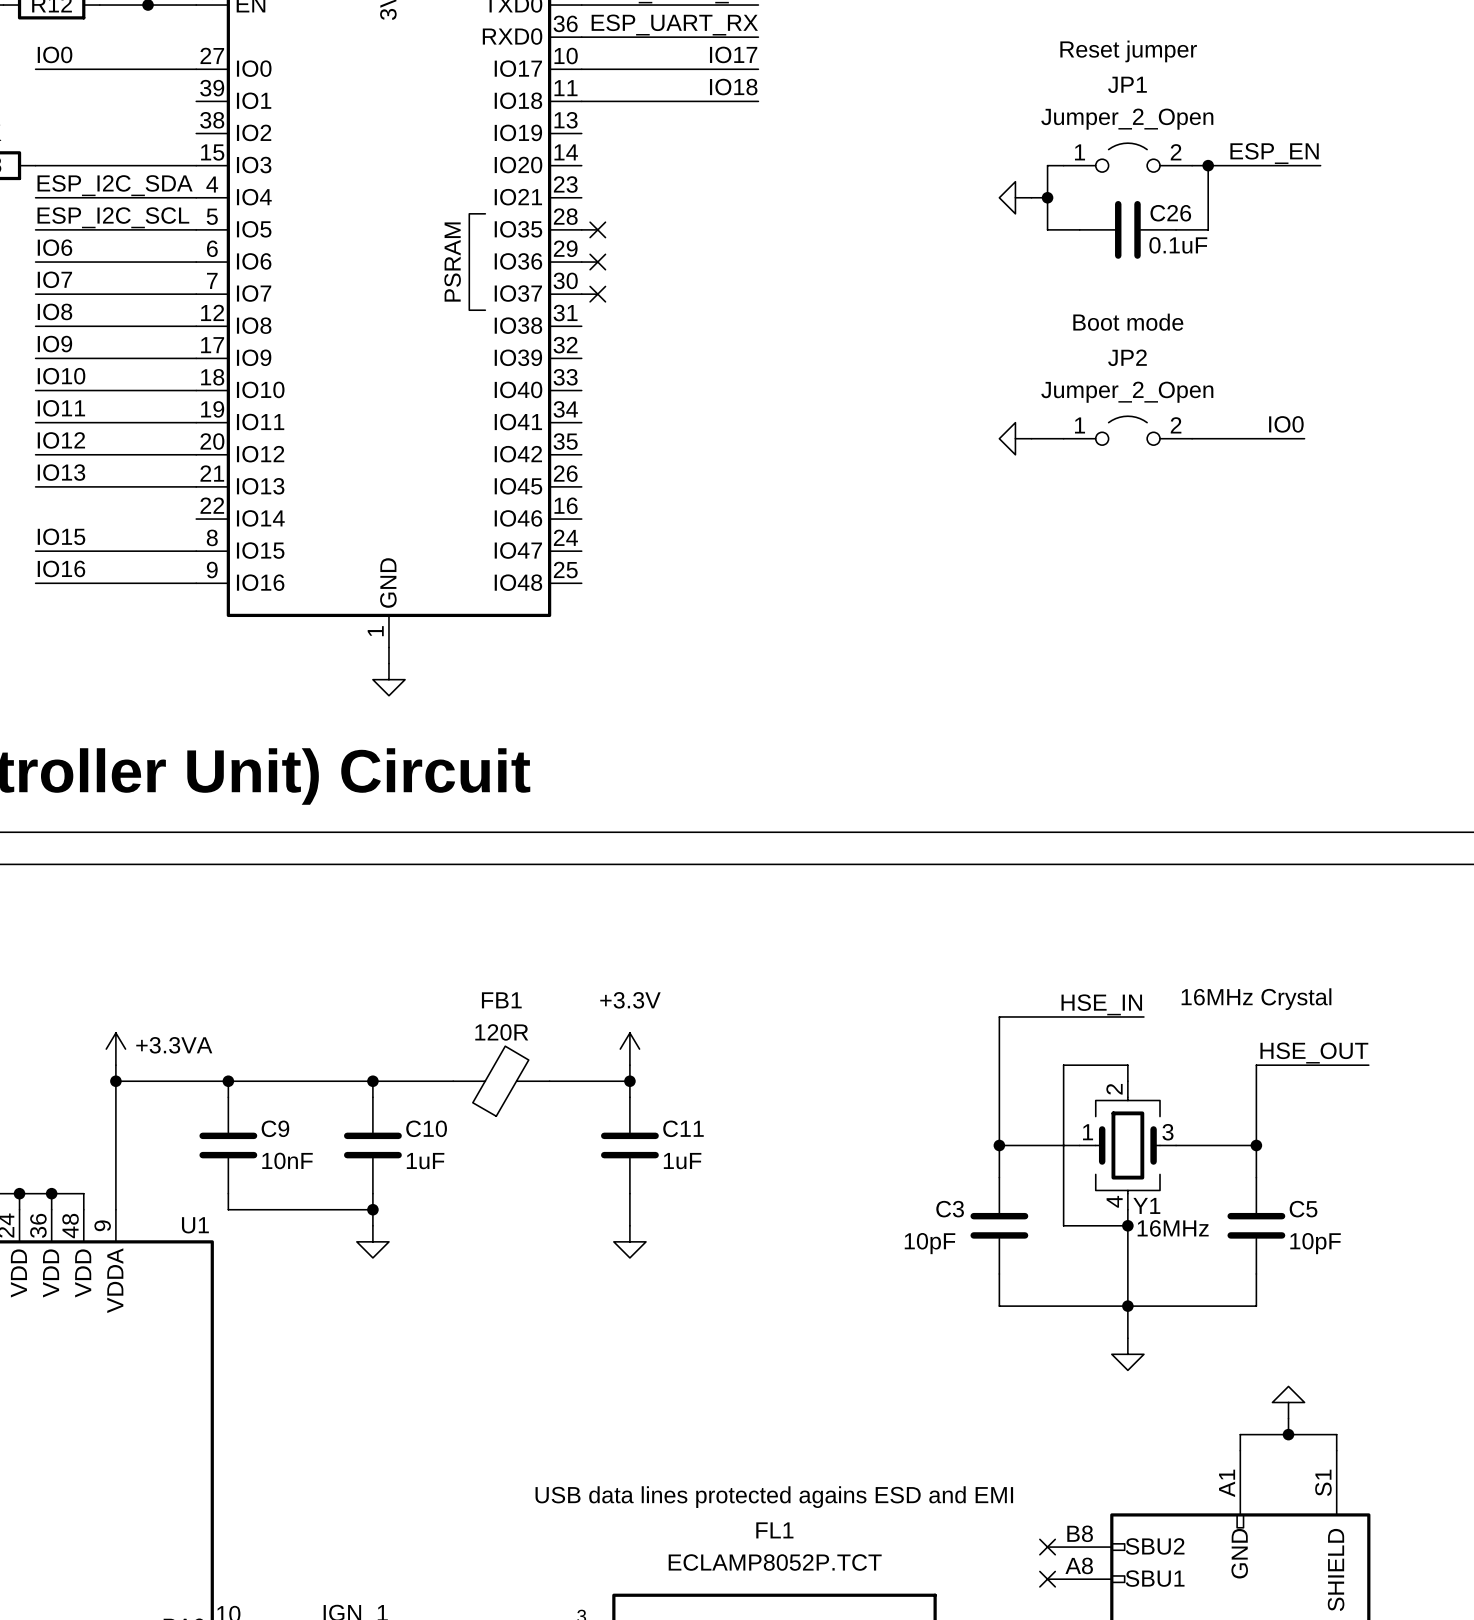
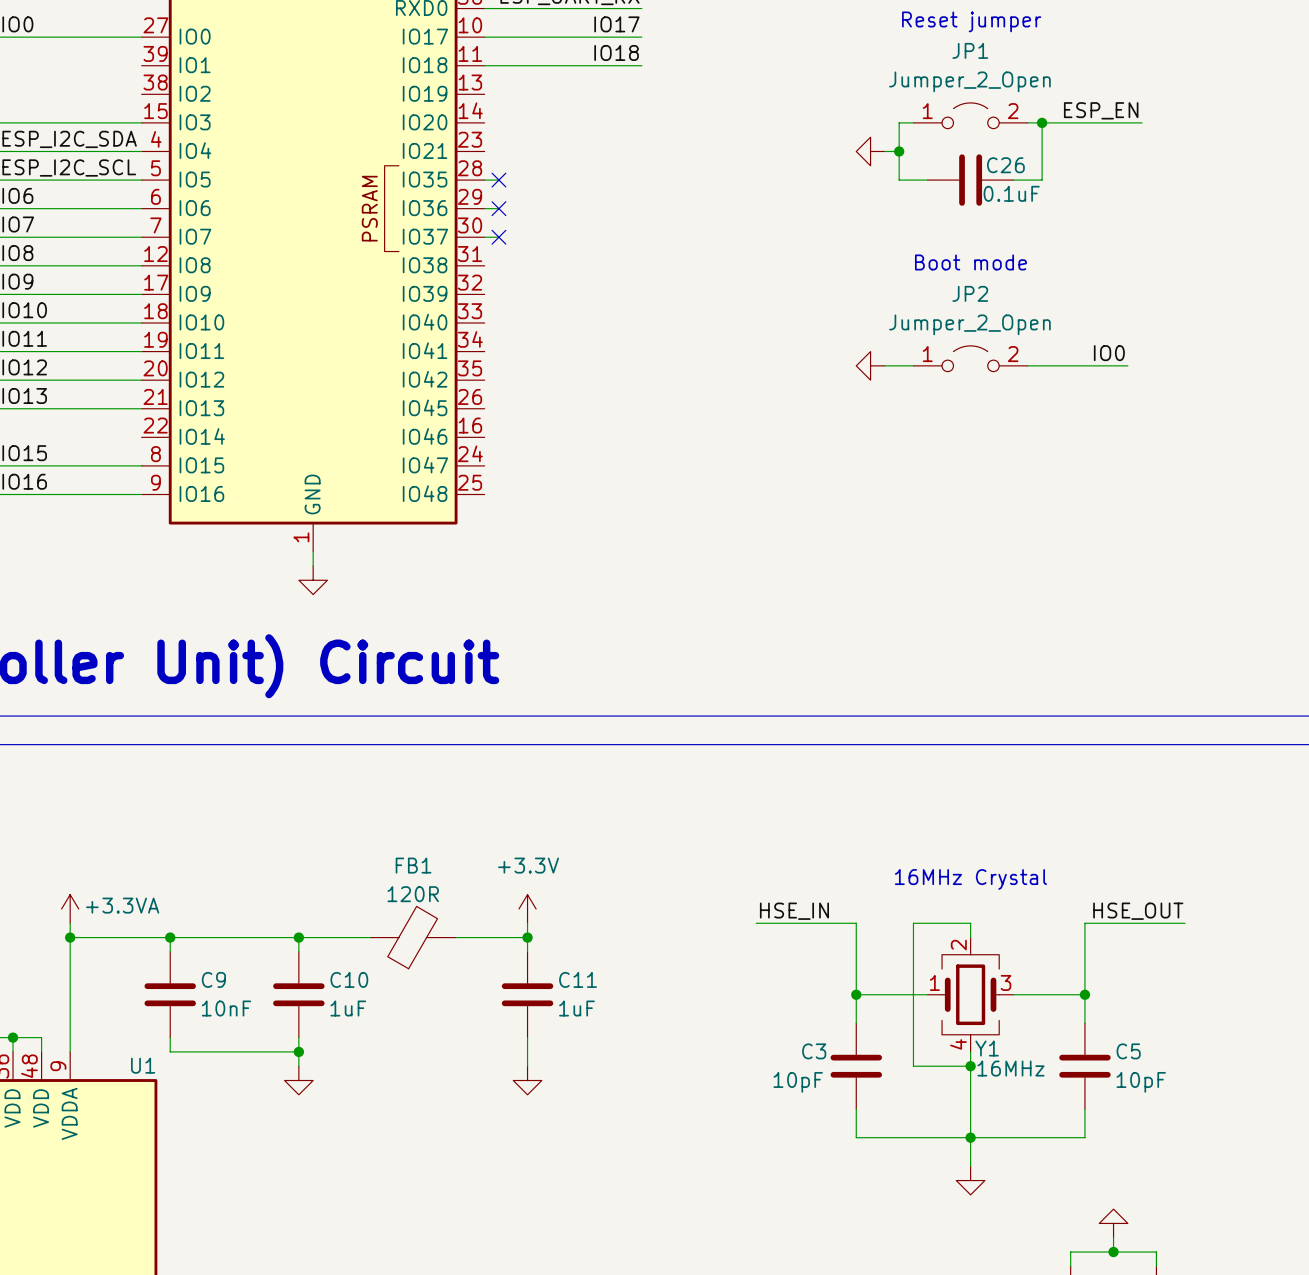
text position: 16MHz Crystal (1256, 999) -> 16MHz Crystal (970, 879)
label position: HSE_IN (1101, 1004) -> HSE_IN (794, 911)
wire: (1143, 1016) (999, 1016) (999, 1065) -> (756, 923) (856, 923)

